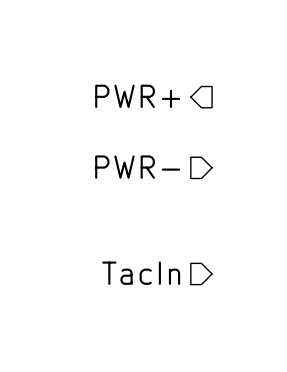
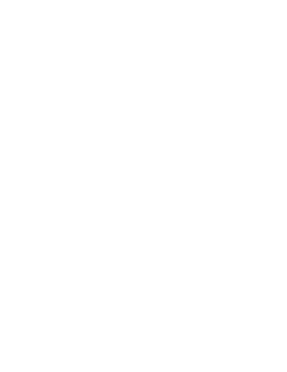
hierarchical label: PWR+ (137, 96) -> none
hierarchical label: PWR- (137, 167) -> none
hierarchical label: TacIn (141, 273) -> none

